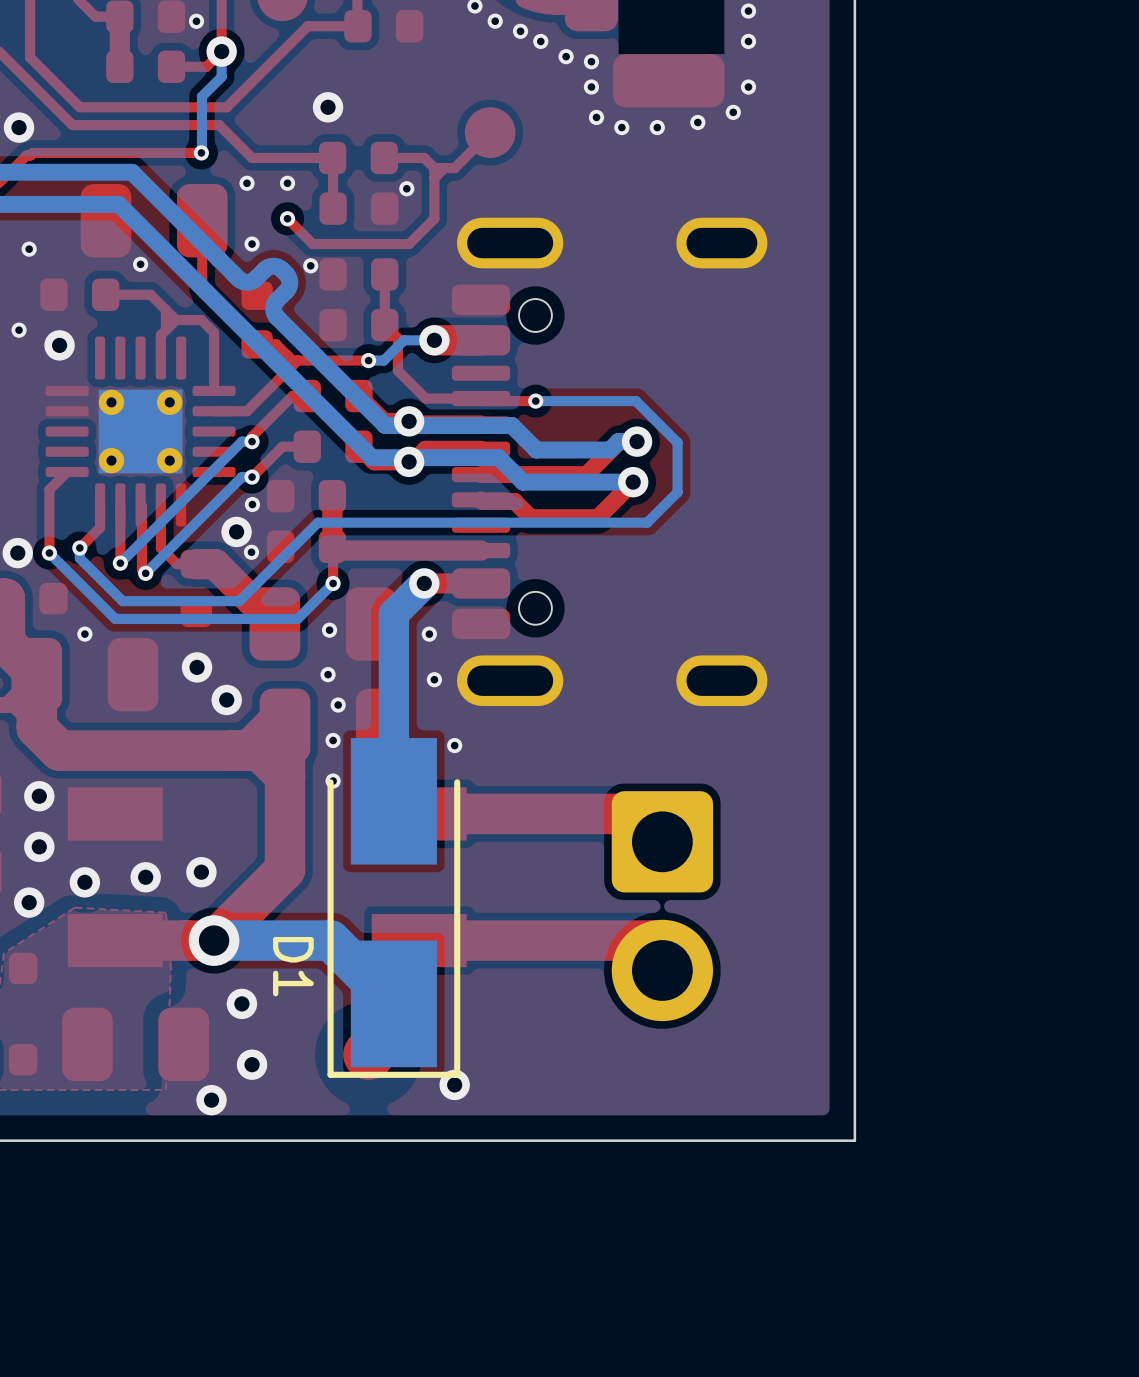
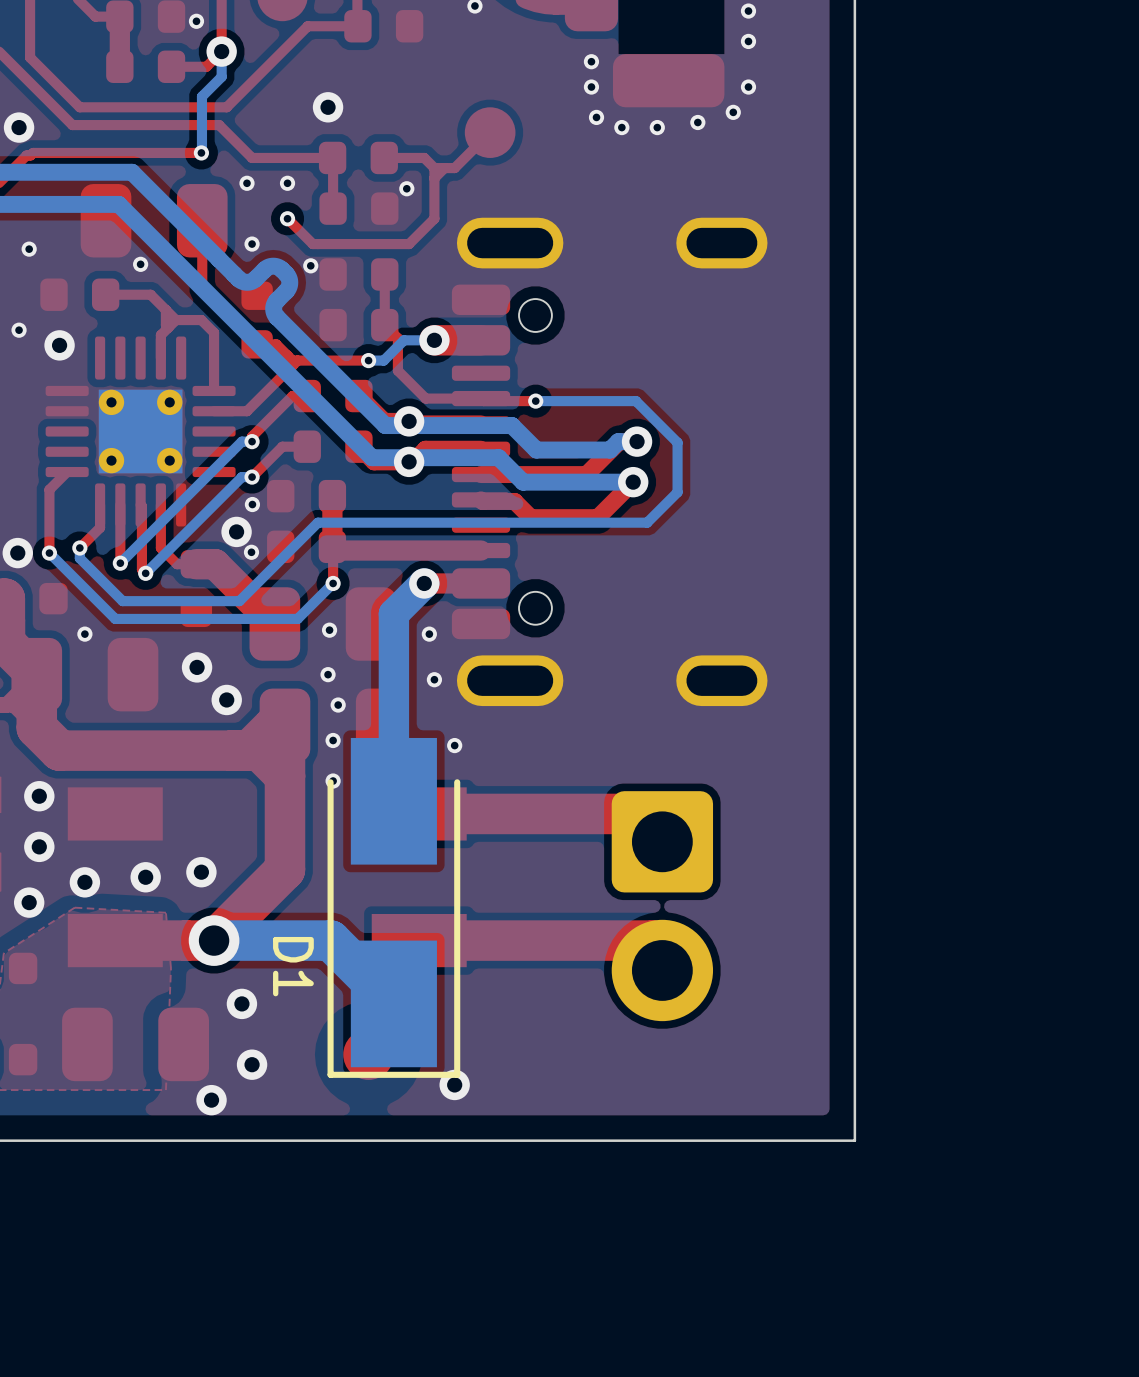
via: (495, 21) -> none
via: (520, 31) -> none
via: (540, 41) -> none
via: (566, 56) -> none

